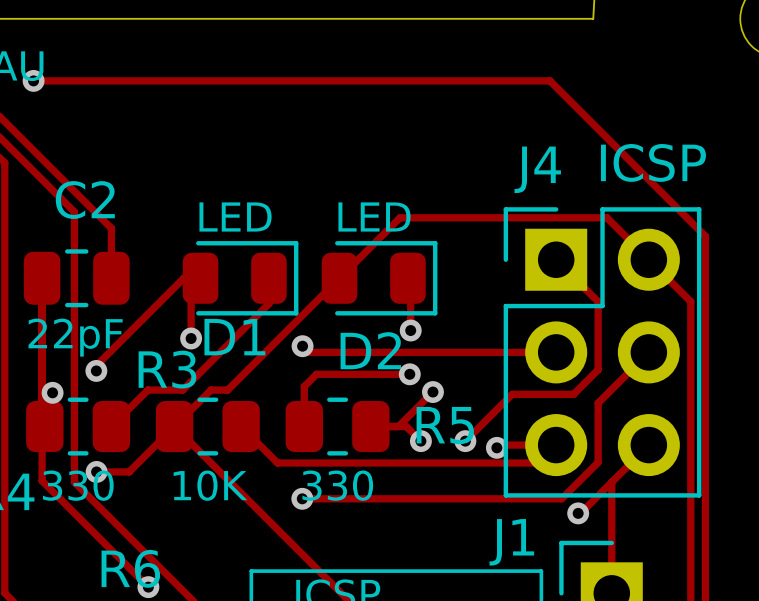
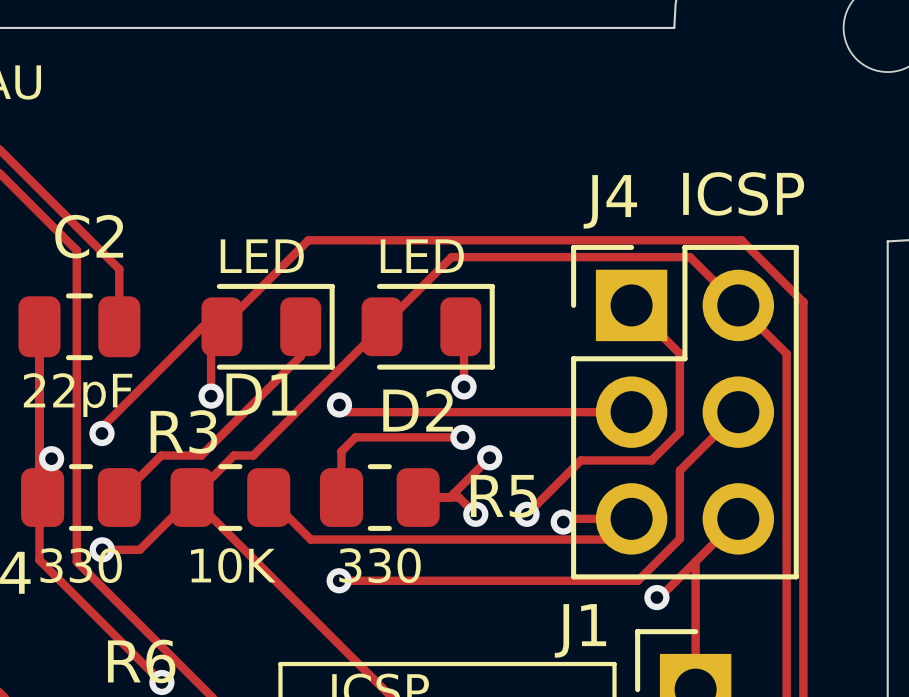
track: (33, 80) (549, 80) (705, 236) (705, 256) -> (221, 326) (308, 240) (741, 240) (803, 302)
via: (33, 80) -> none

